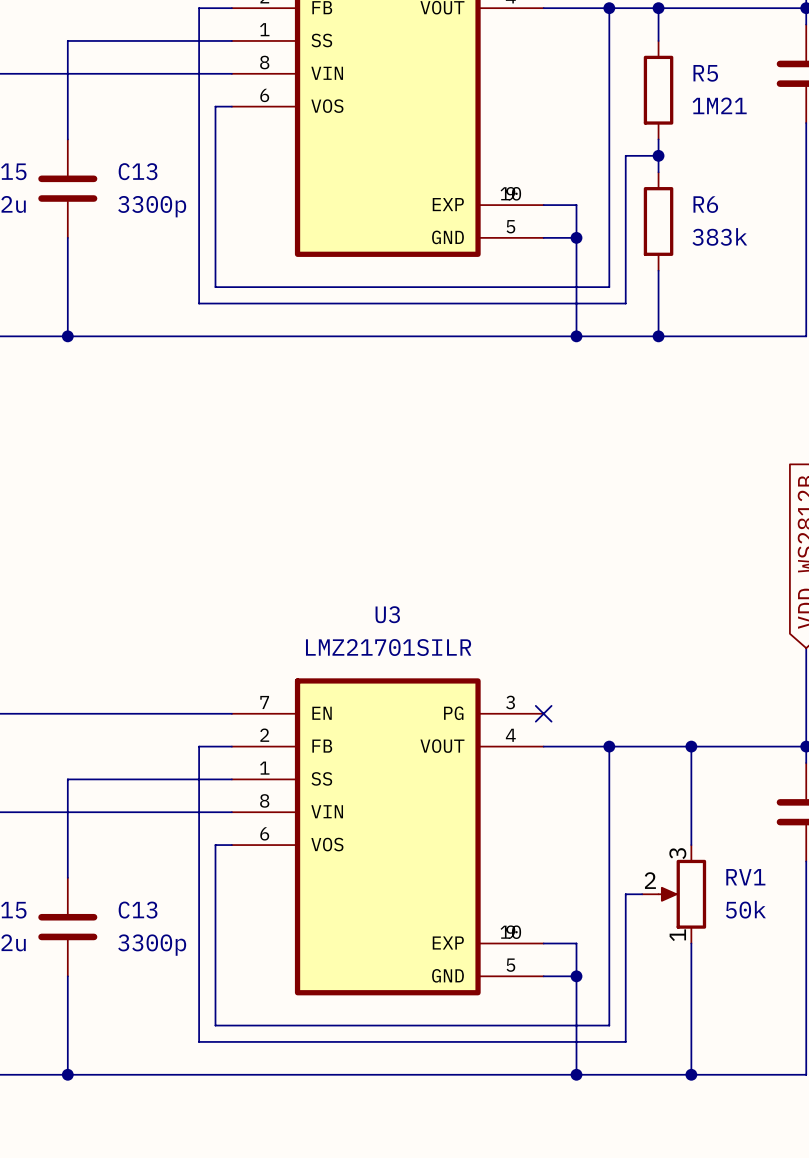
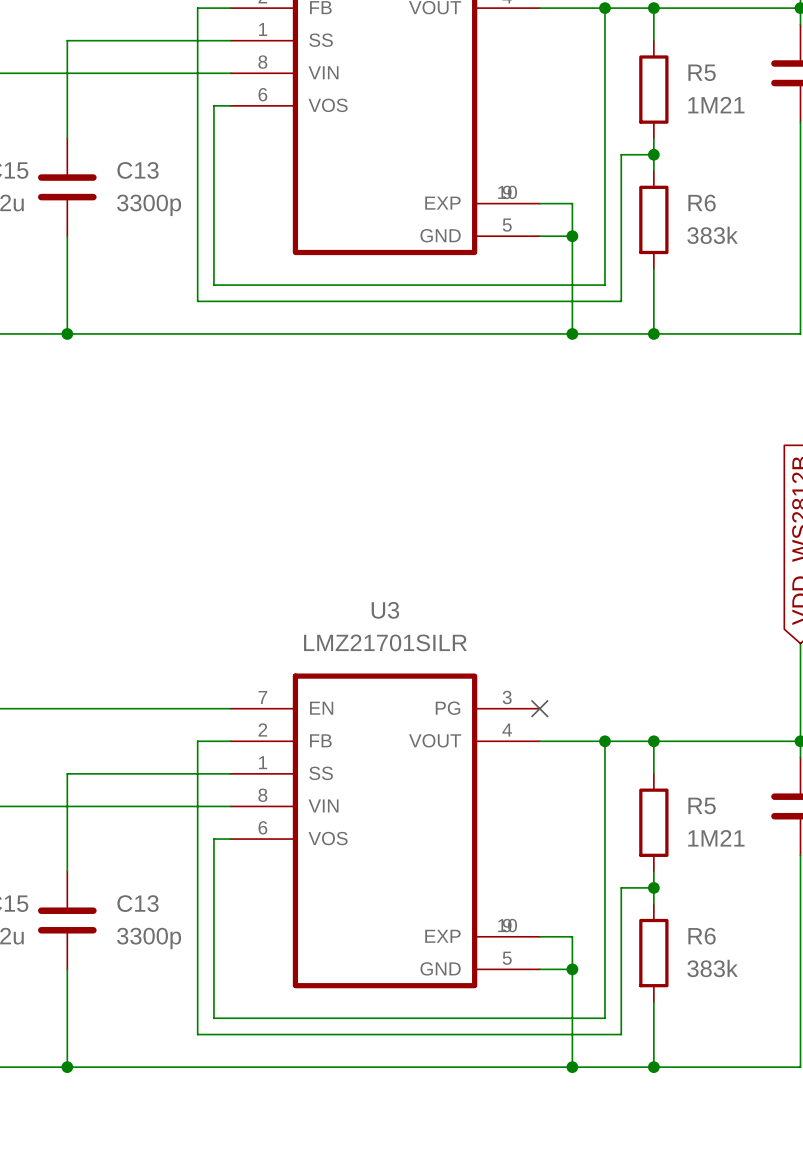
wire: none -> (653, 741) (653, 773)
wire: (691, 746) (691, 845) -> none
junction position: (691, 746) -> (653, 741)
R5: none -> 1M21 (653, 822)
wire: none -> (653, 871) (653, 904)
junction: none -> (653, 887)
RV1: 50k (674, 894) -> none
wire: (691, 943) (691, 1074) -> none
R6: none -> 383k (653, 953)
wire: none -> (653, 1001) (653, 1067)
junction position: (691, 1074) -> (653, 1067)

